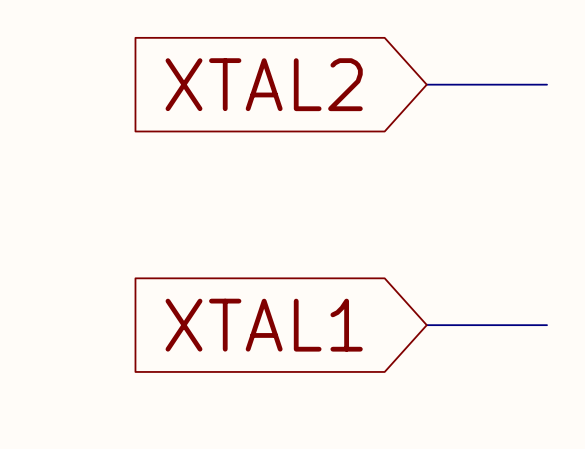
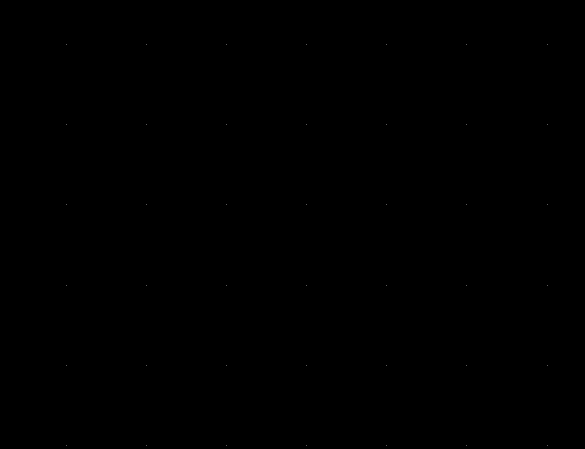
global label: XTAL2 (264, 84) -> none
wire: (426, 84) (547, 84) -> none
global label: XTAL1 (264, 325) -> none
wire: (426, 325) (547, 325) -> none

